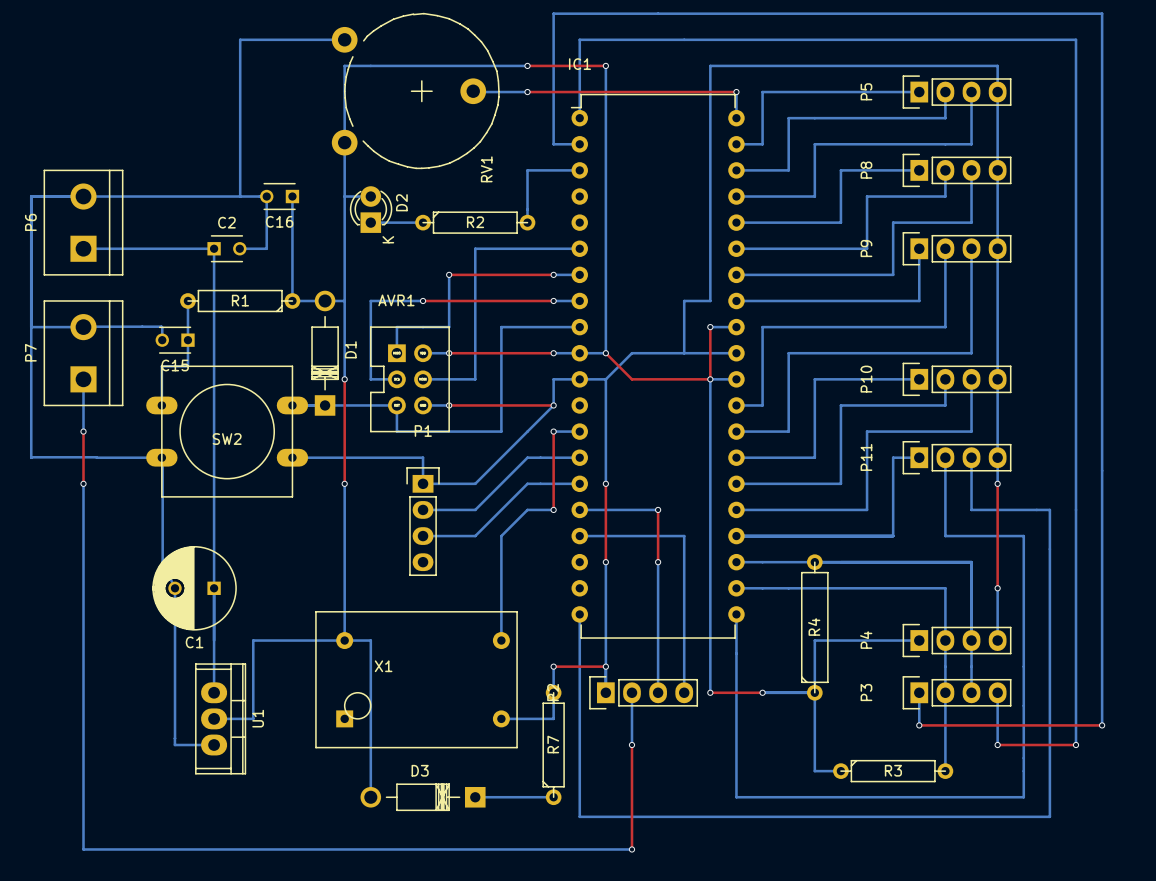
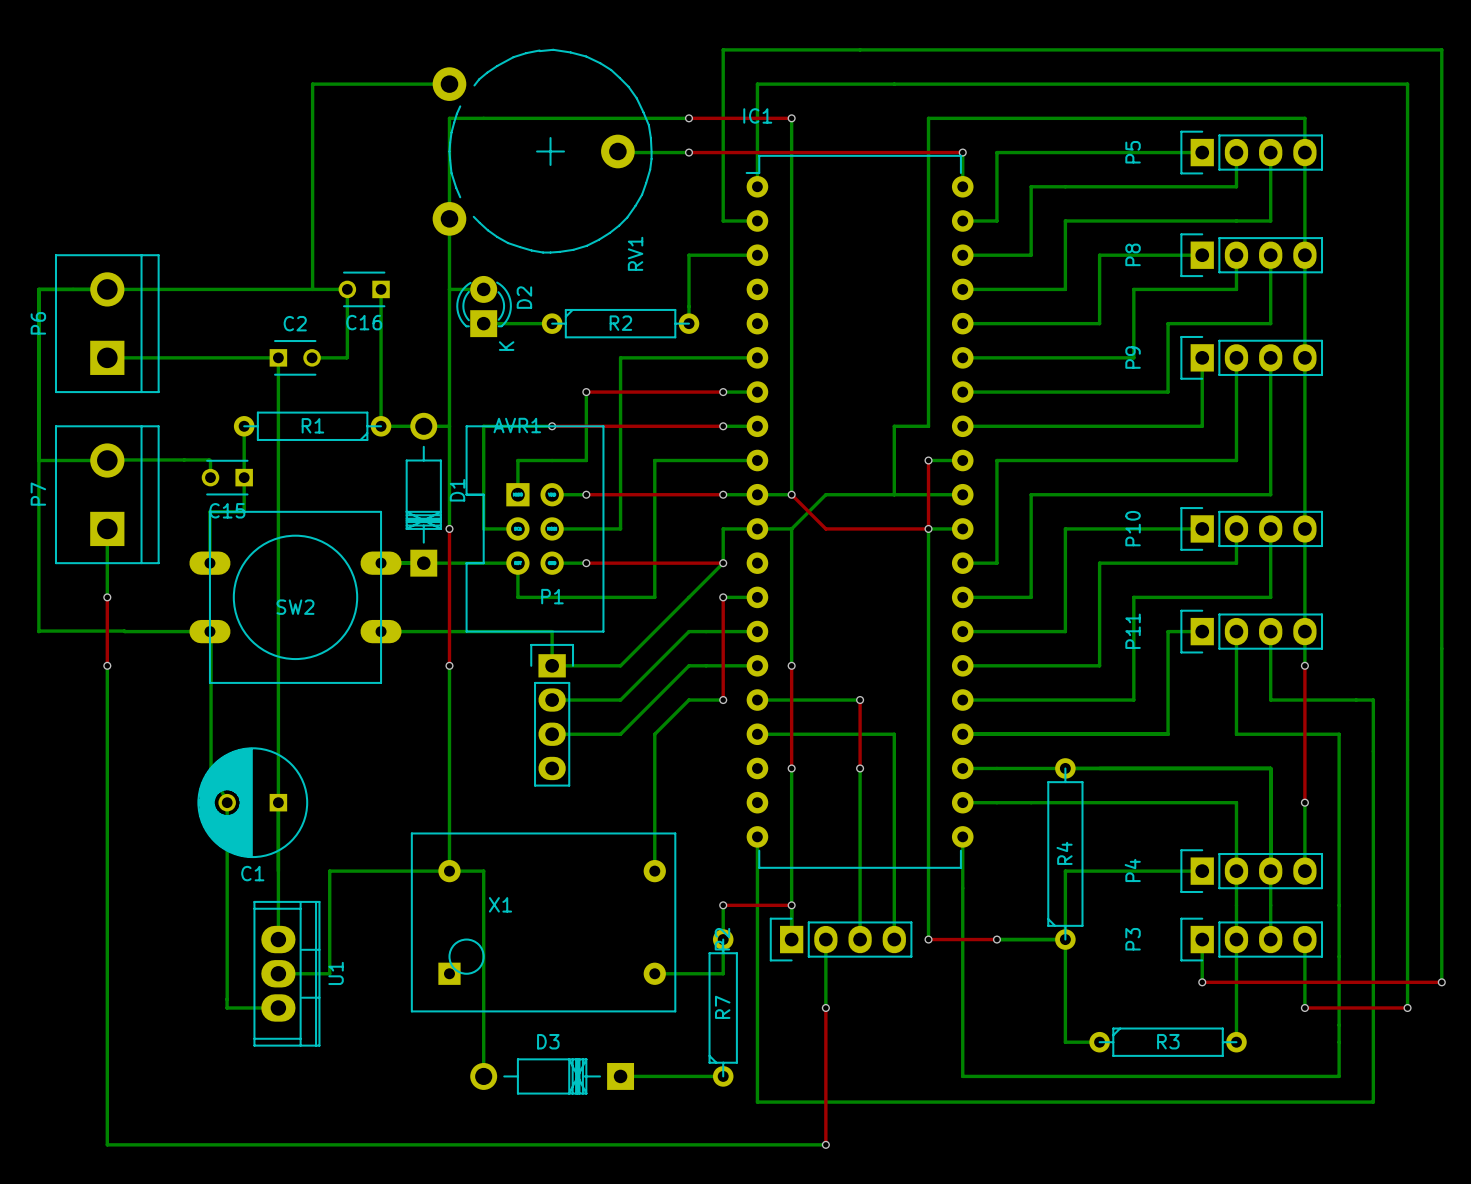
AVR1 footprint: [370, 326, 450, 433] -> [465, 425, 605, 633]

